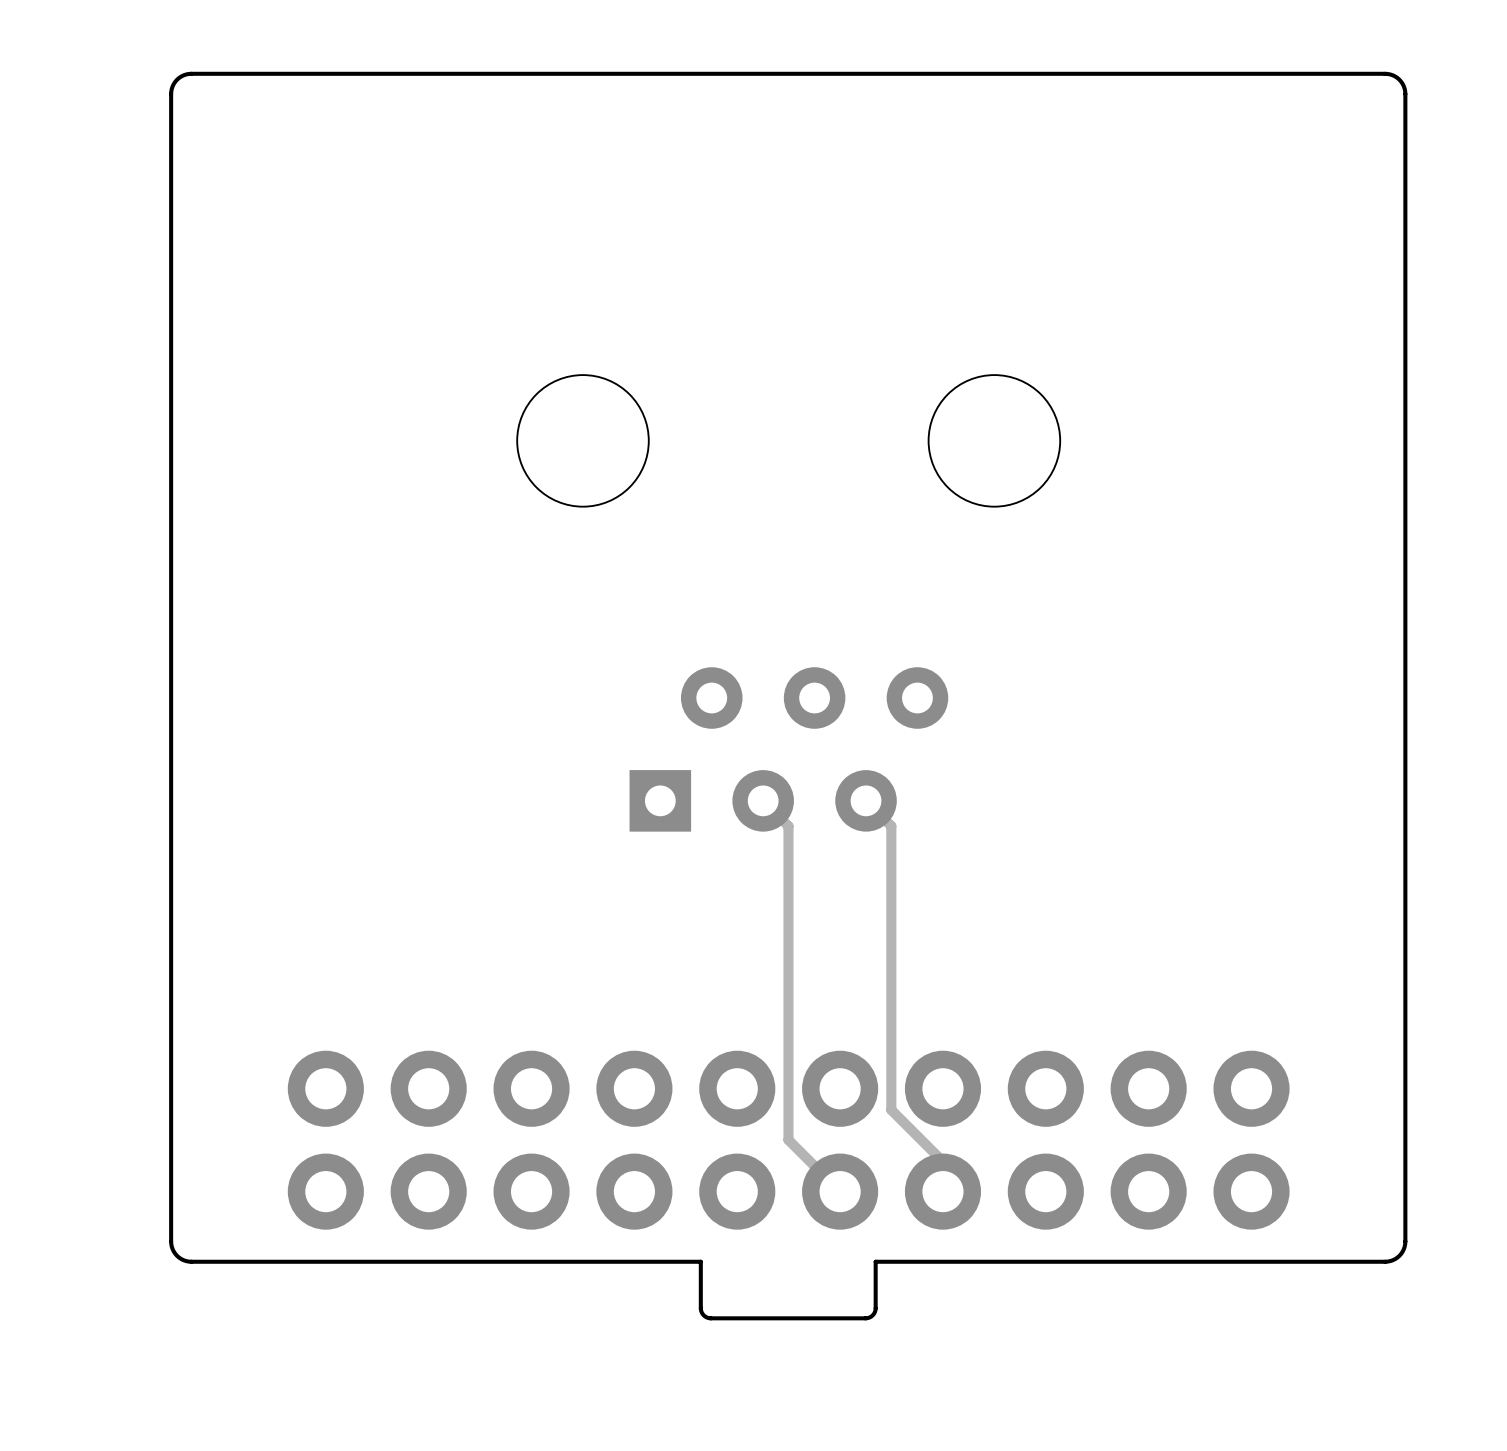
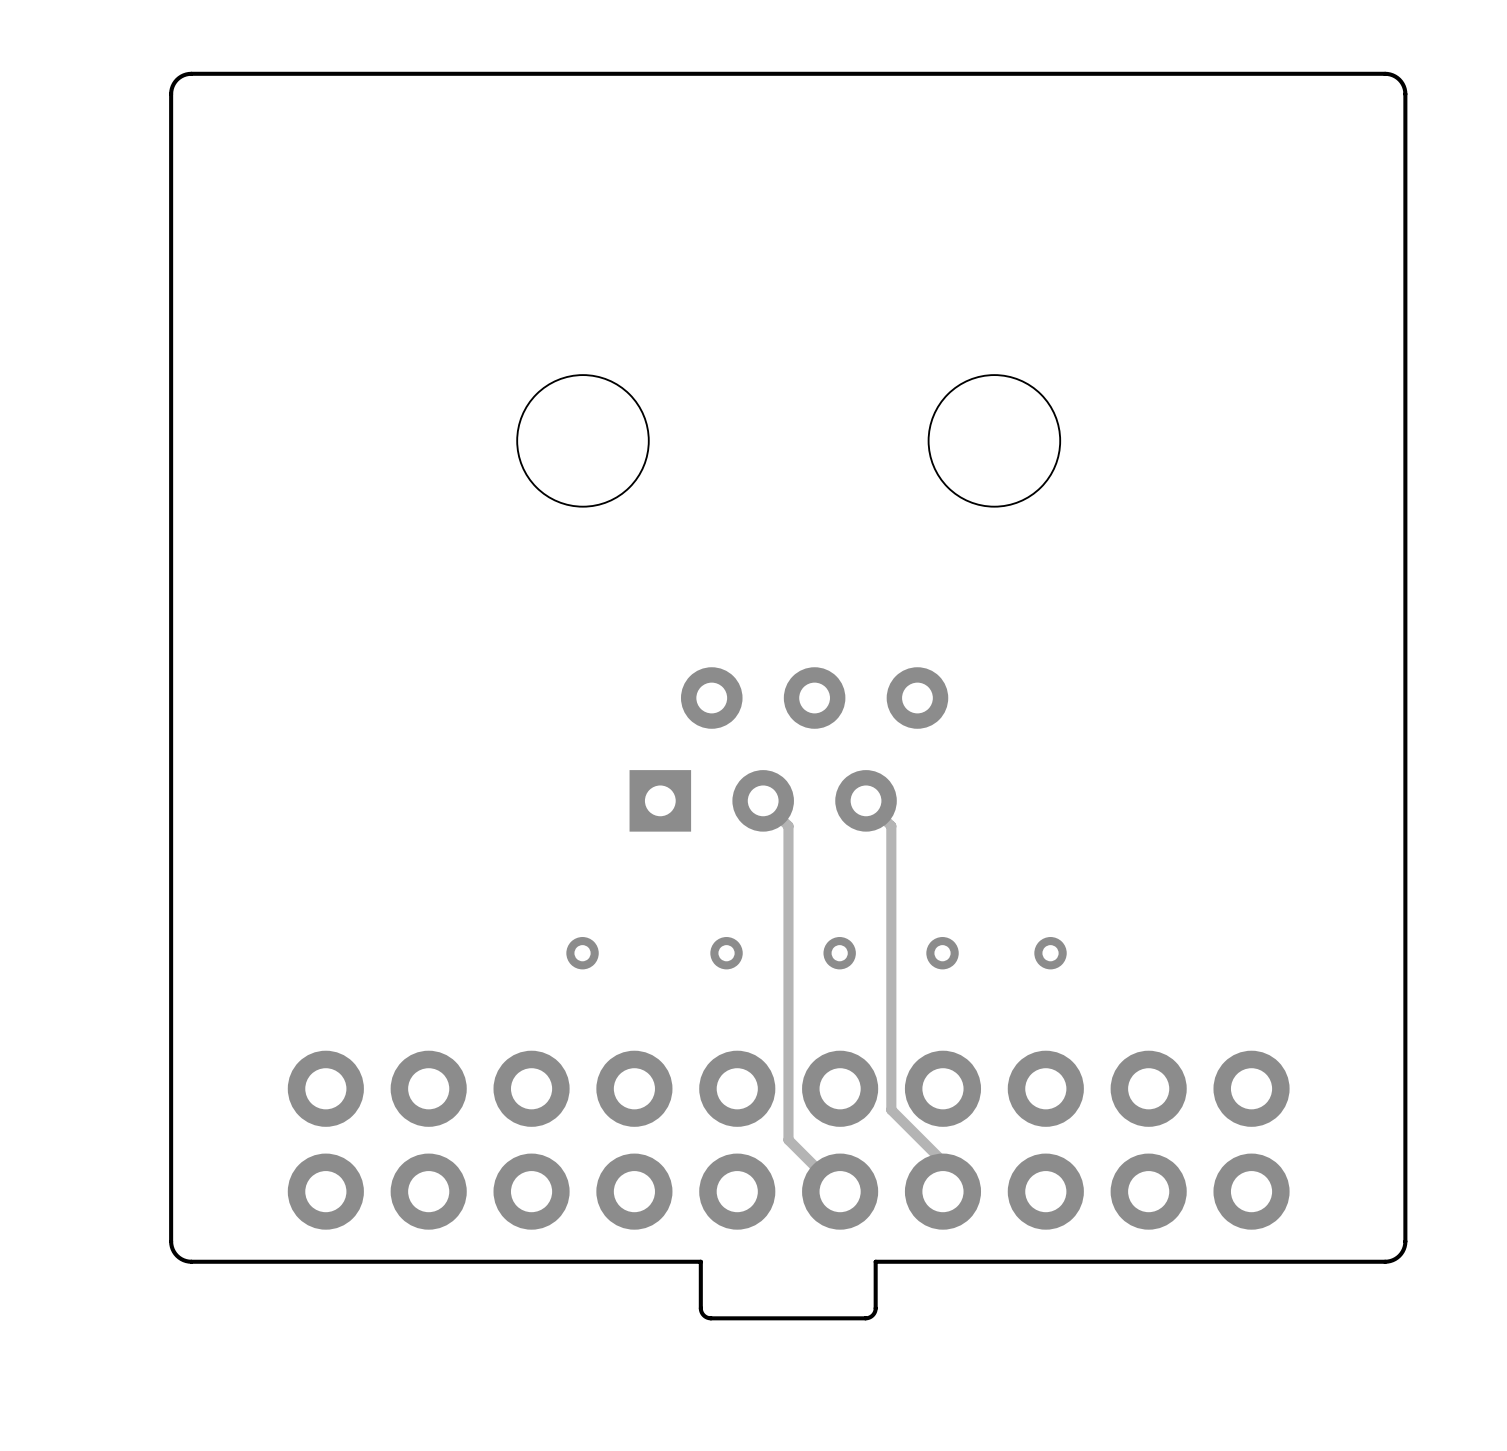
via: none -> (582, 953)
via: none -> (726, 953)
via: none -> (839, 953)
via: none -> (942, 953)
via: none -> (1050, 953)

